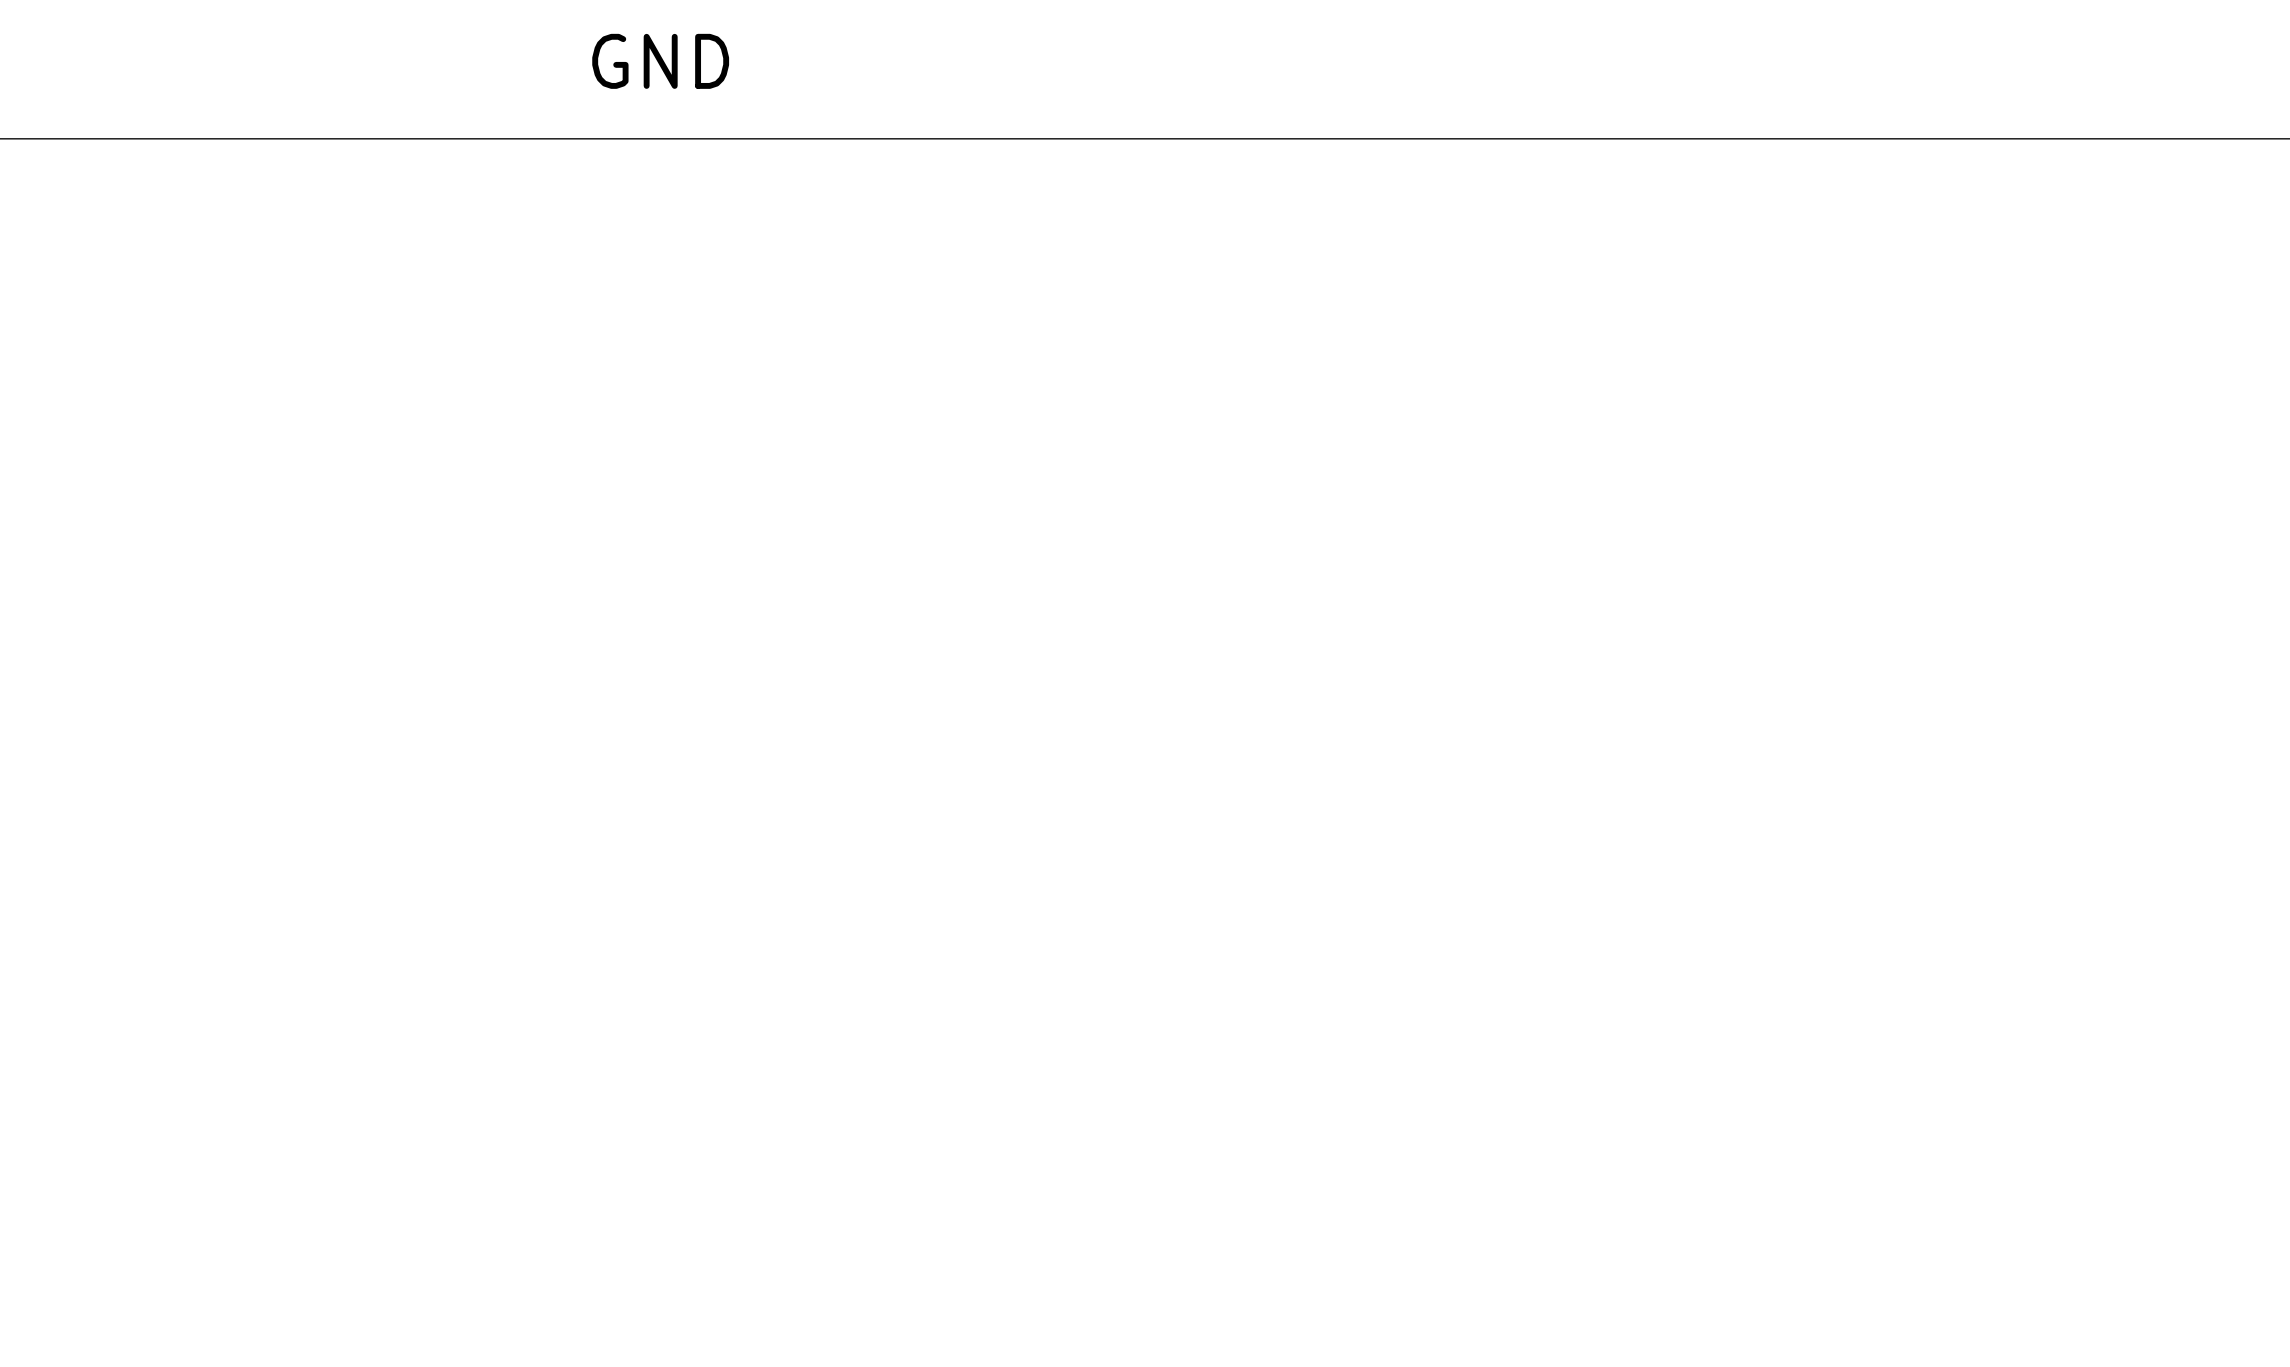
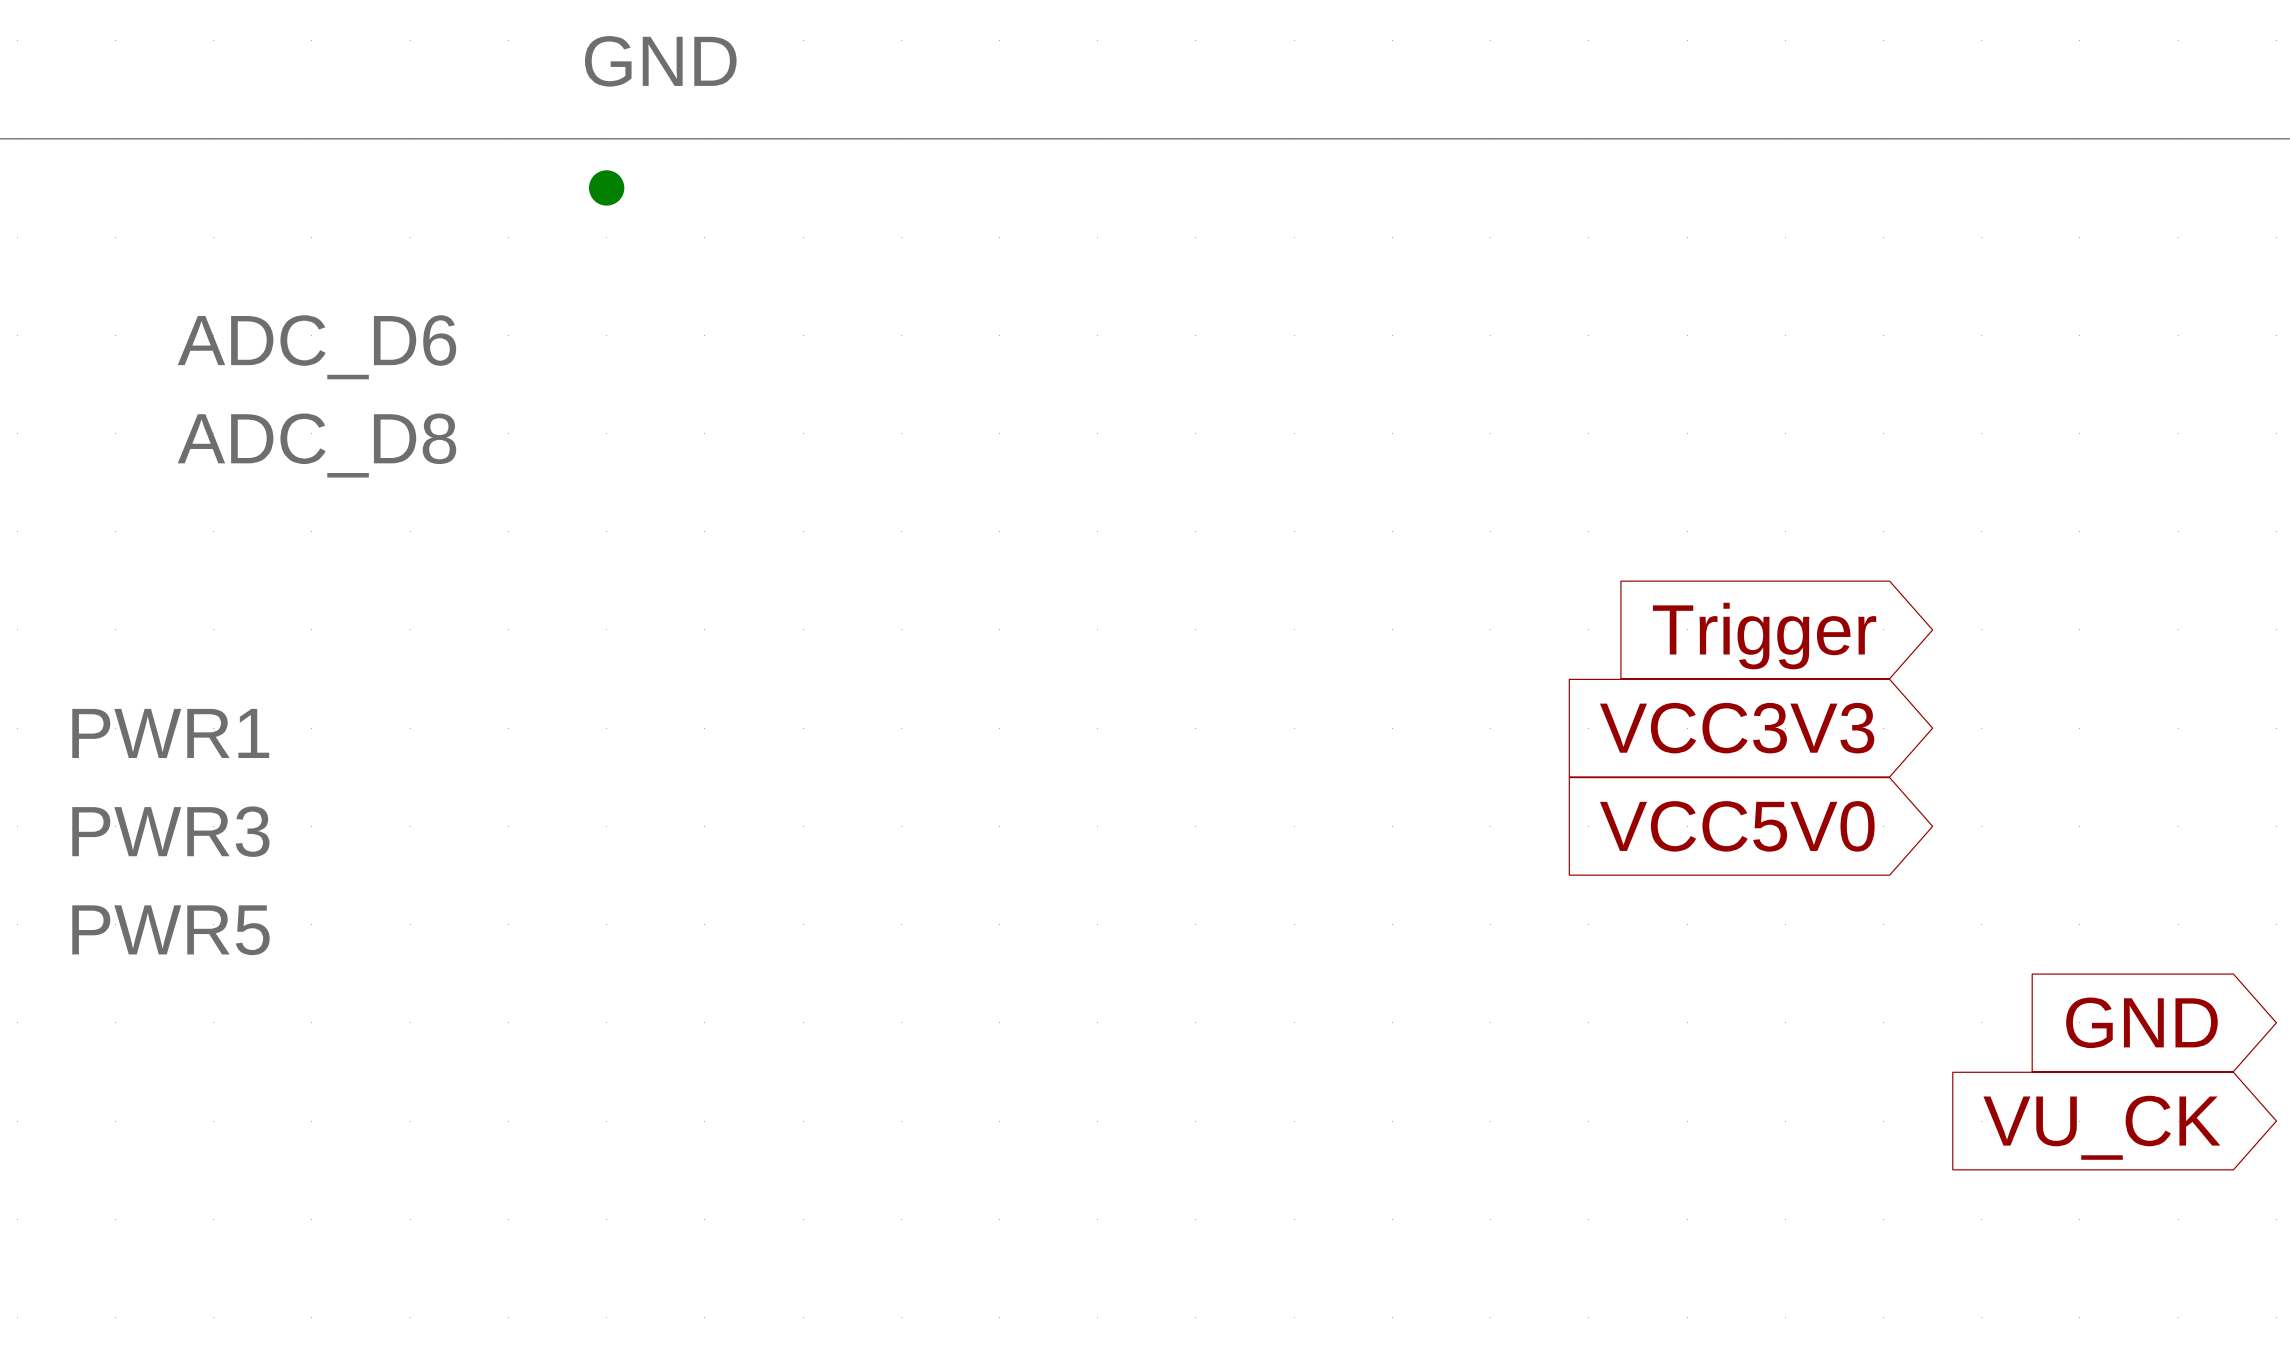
junction: none -> (606, 187)
label: none -> ADC_D6 (316, 347)
label: none -> ADC_D8 (317, 445)
global label: none -> Trigger (1764, 636)
global label: none -> VCC3V3 (1737, 728)
label: none -> PWR1 (170, 733)
global label: none -> VCC5V0 (1737, 826)
label: none -> PWR3 (170, 831)
label: none -> PWR5 (170, 930)
global label: none -> GND (2141, 1022)
global label: none -> VU_CK (2101, 1127)

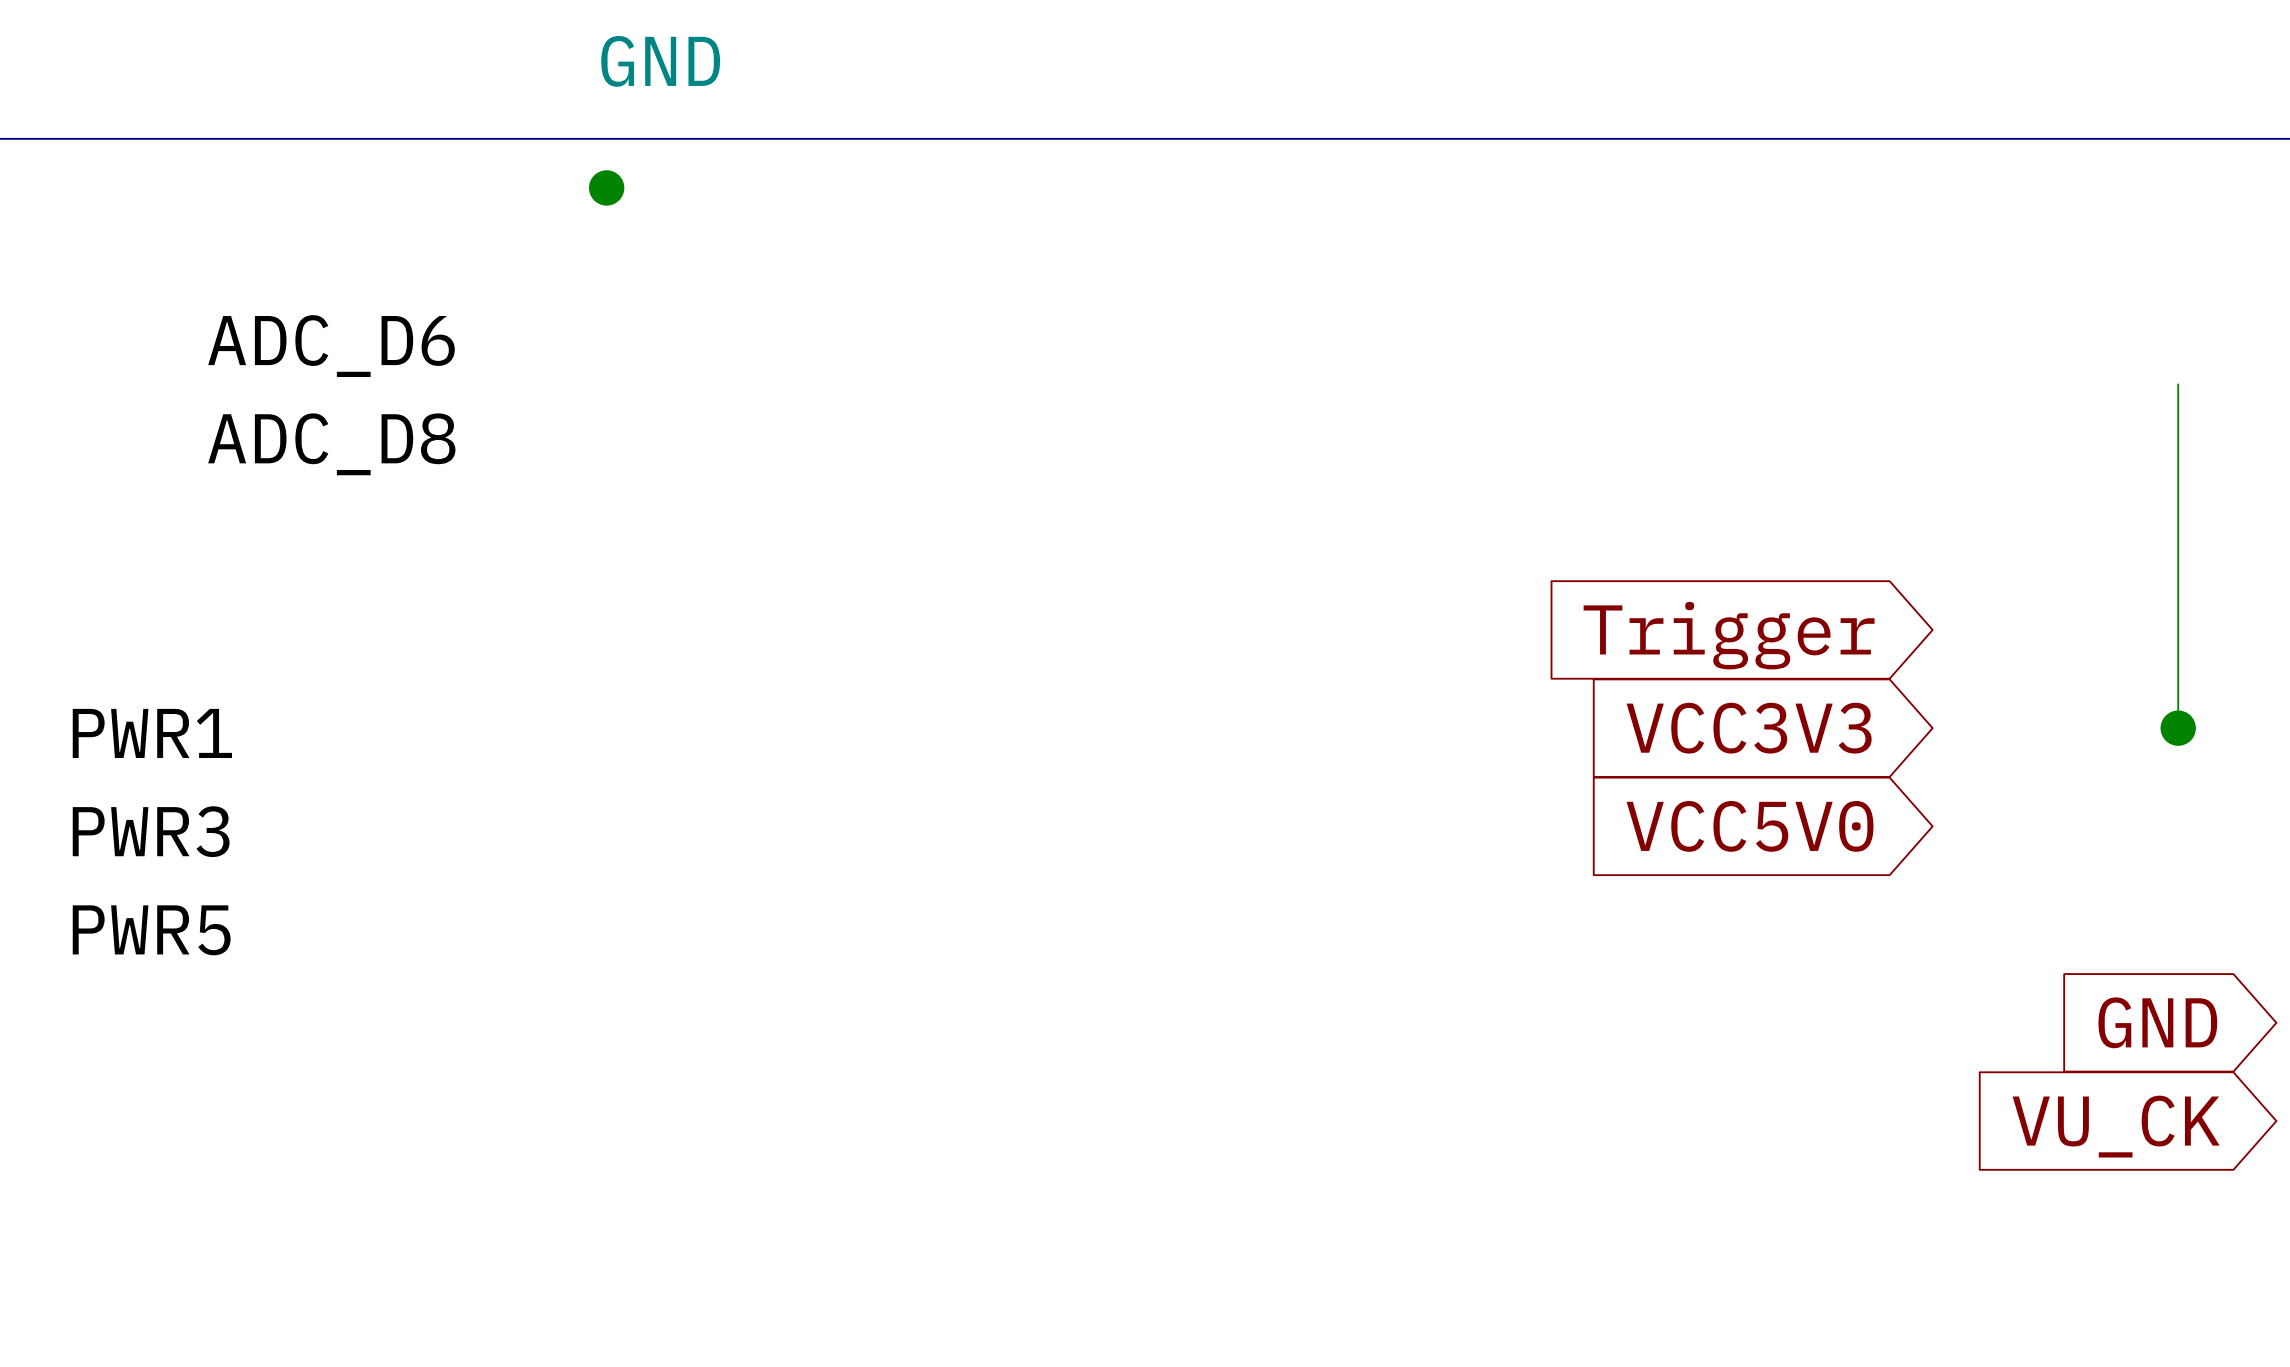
wire: none -> (2178, 384) (2178, 728)
junction: none -> (2178, 728)

